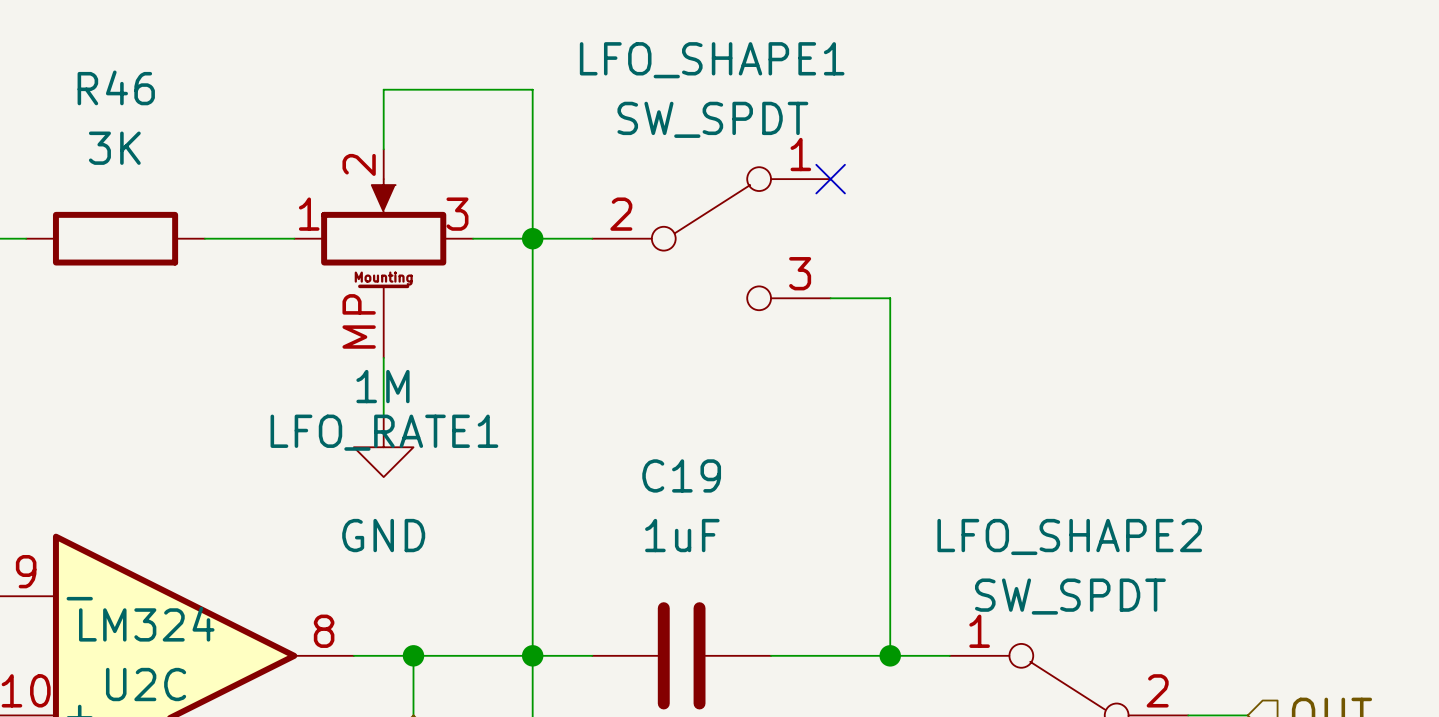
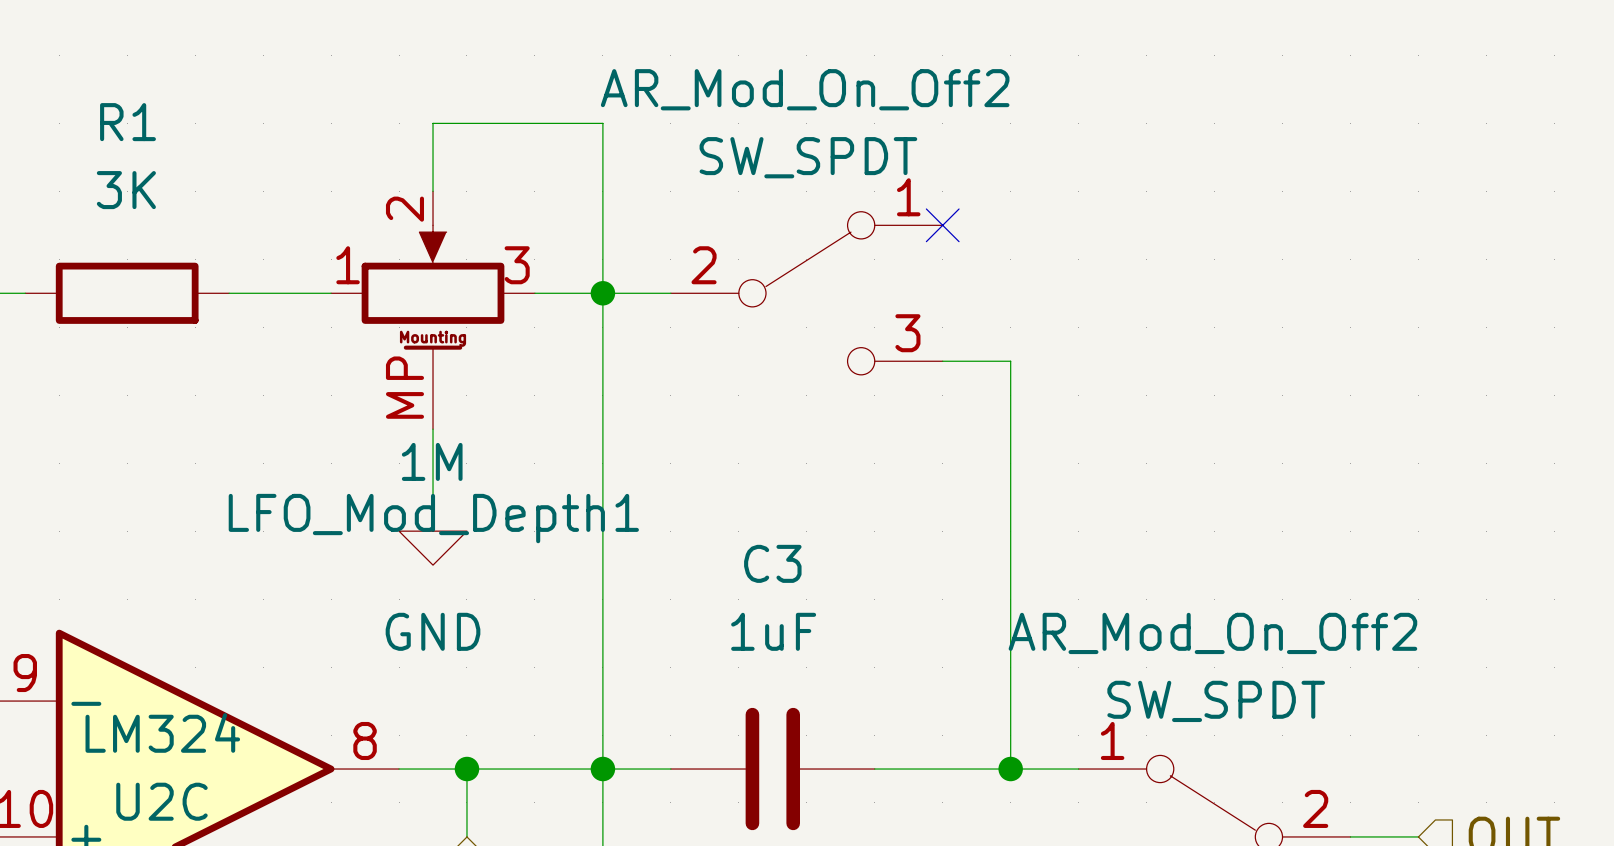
LFO_SHAPE1 name: LFO_SHAPE1 (712, 60) -> AR_Mod_On_Off2 (805, 89)
R46 name: R46 (116, 87) -> R1 (127, 122)
LFO_RATE1 name: LFO_RATE1 (384, 432) -> LFO_Mod_Depth1 (433, 518)
C19 name: C19 (681, 475) -> C3 (772, 563)
LFO_SHAPE2 name: LFO_SHAPE2 (1069, 536) -> AR_Mod_On_Off2 (1212, 633)

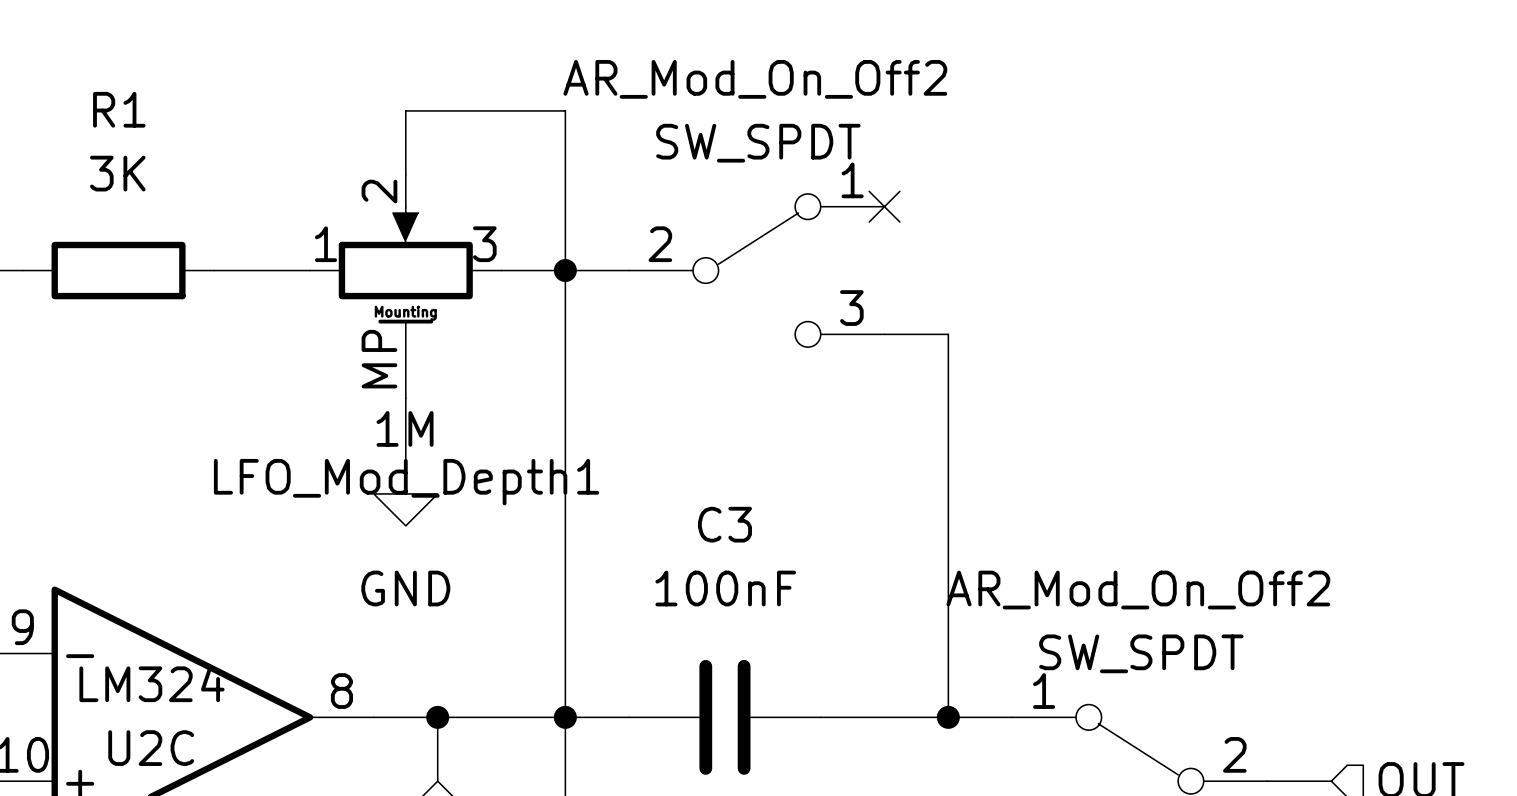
C3 value: 1uF (773, 631) -> 100nF (725, 588)

